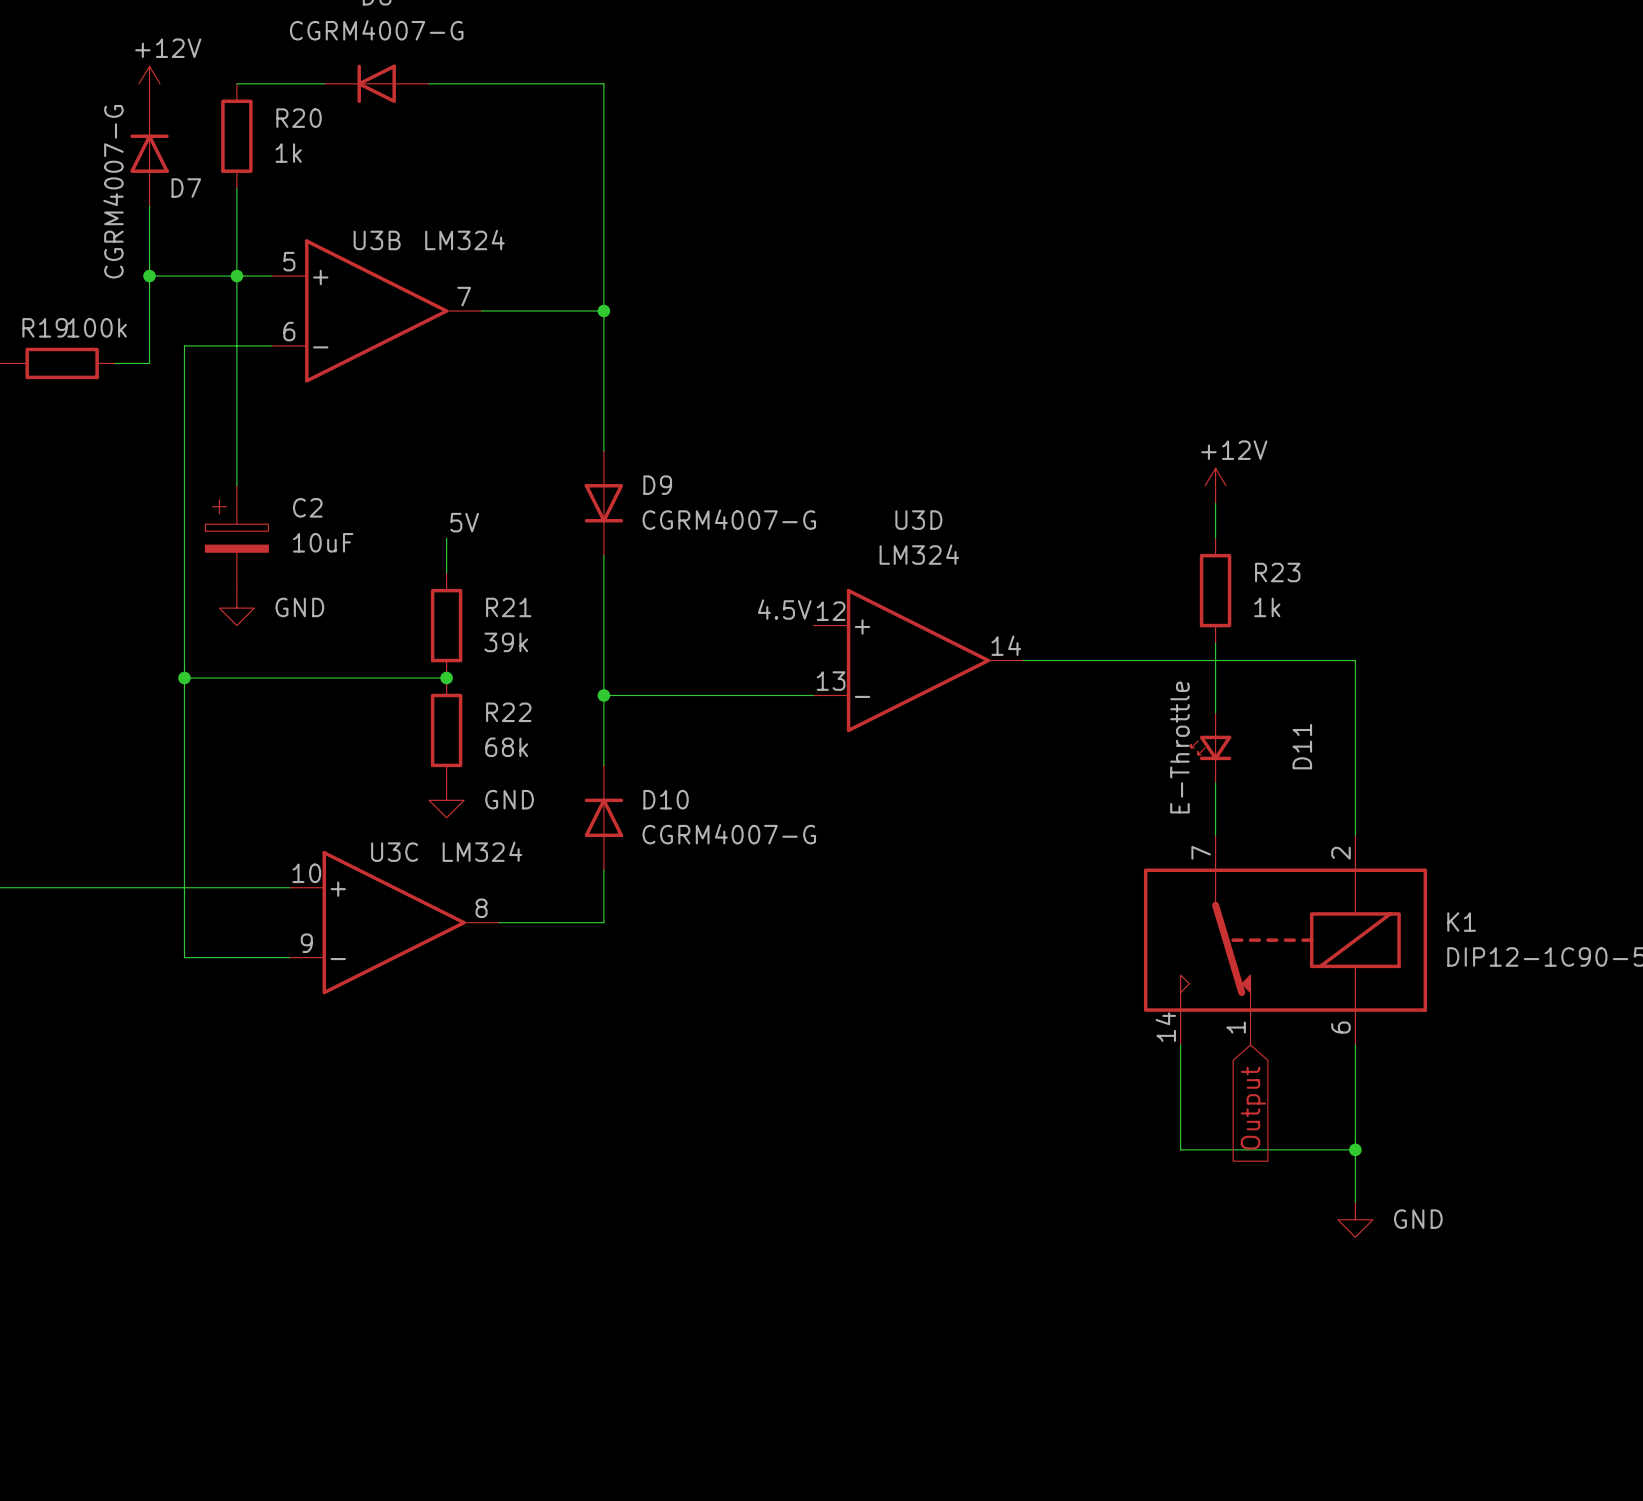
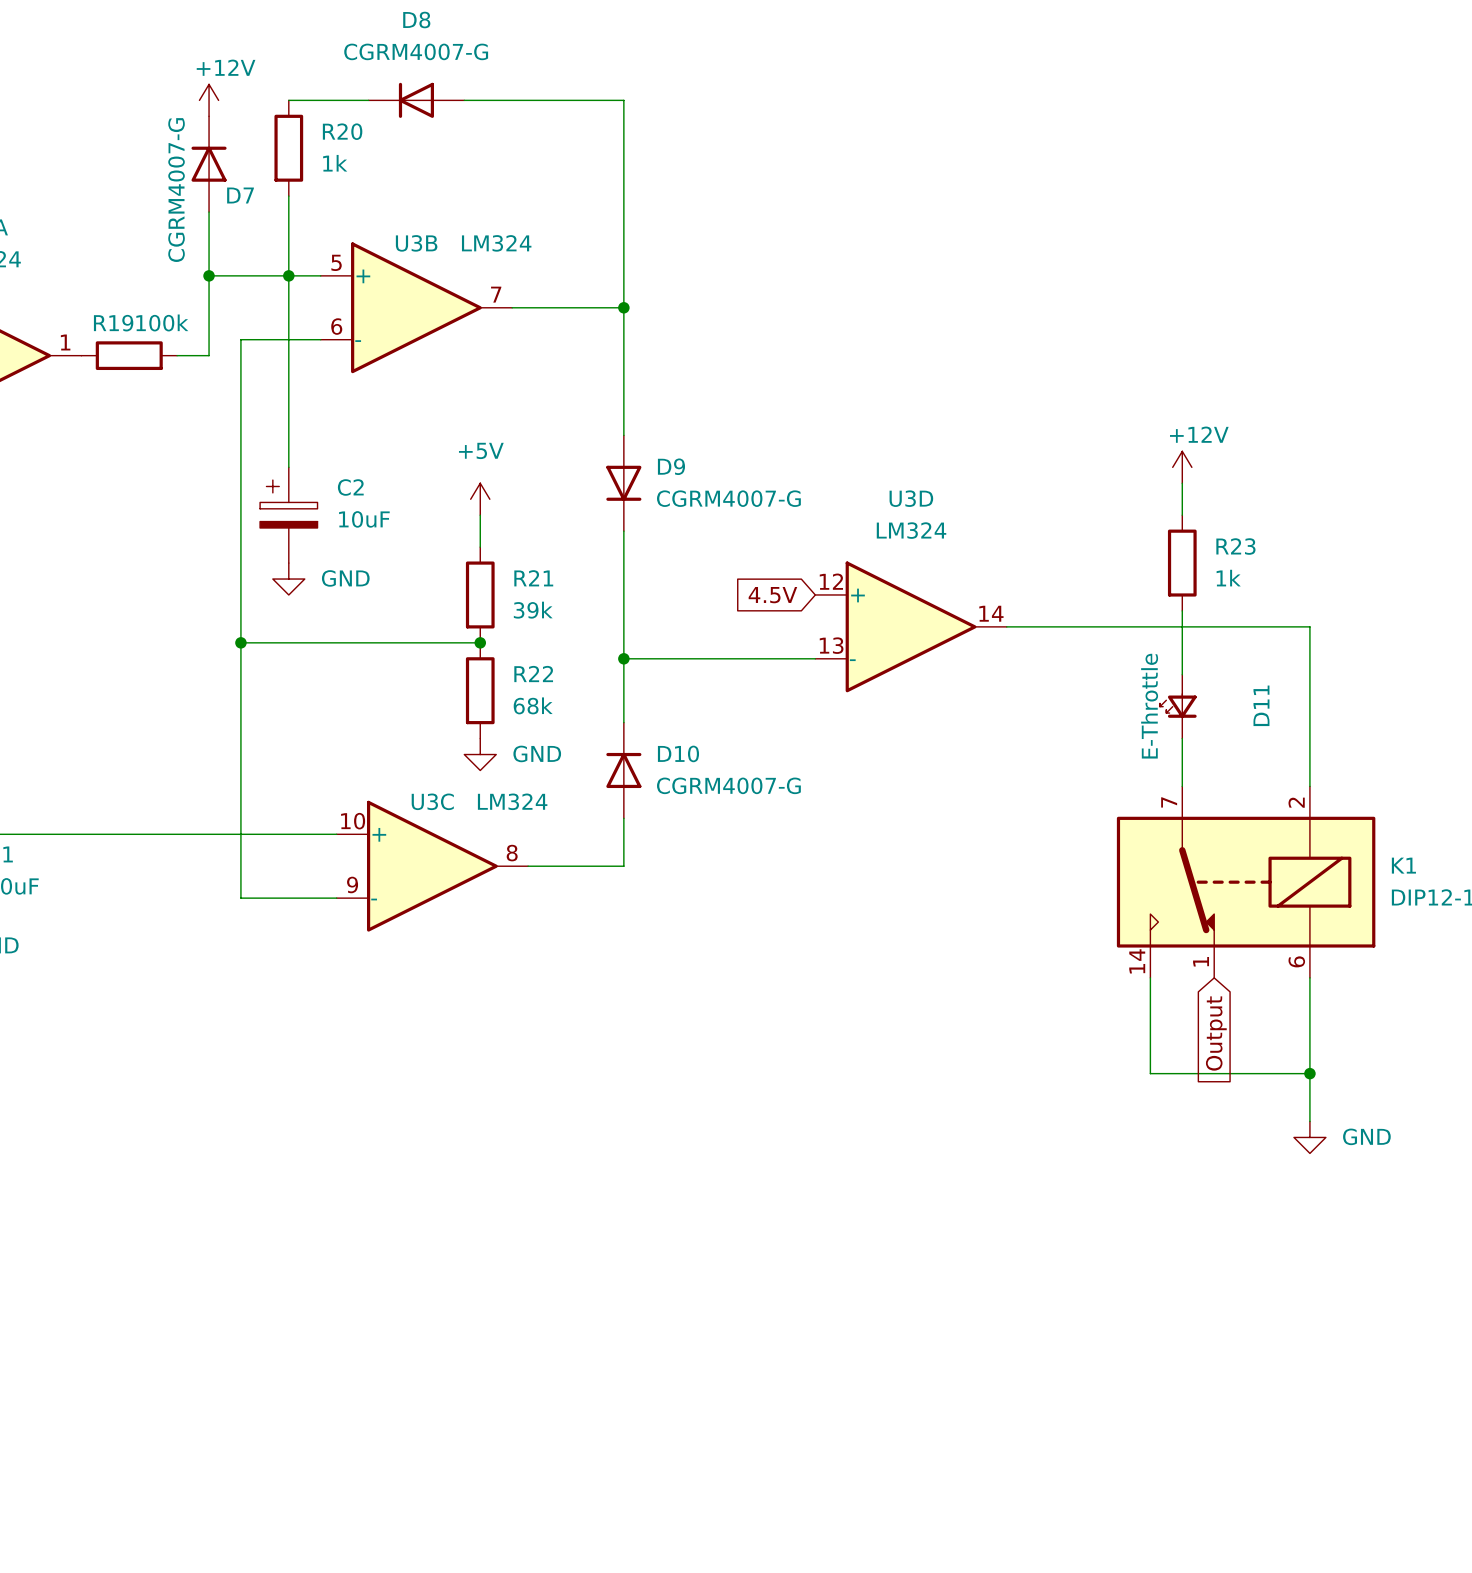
power symbol: none -> +5V (480, 499)
label: 5V (464, 522) -> none
label: 4.5V (784, 609) -> none
global label: none -> 4.5V (772, 595)

